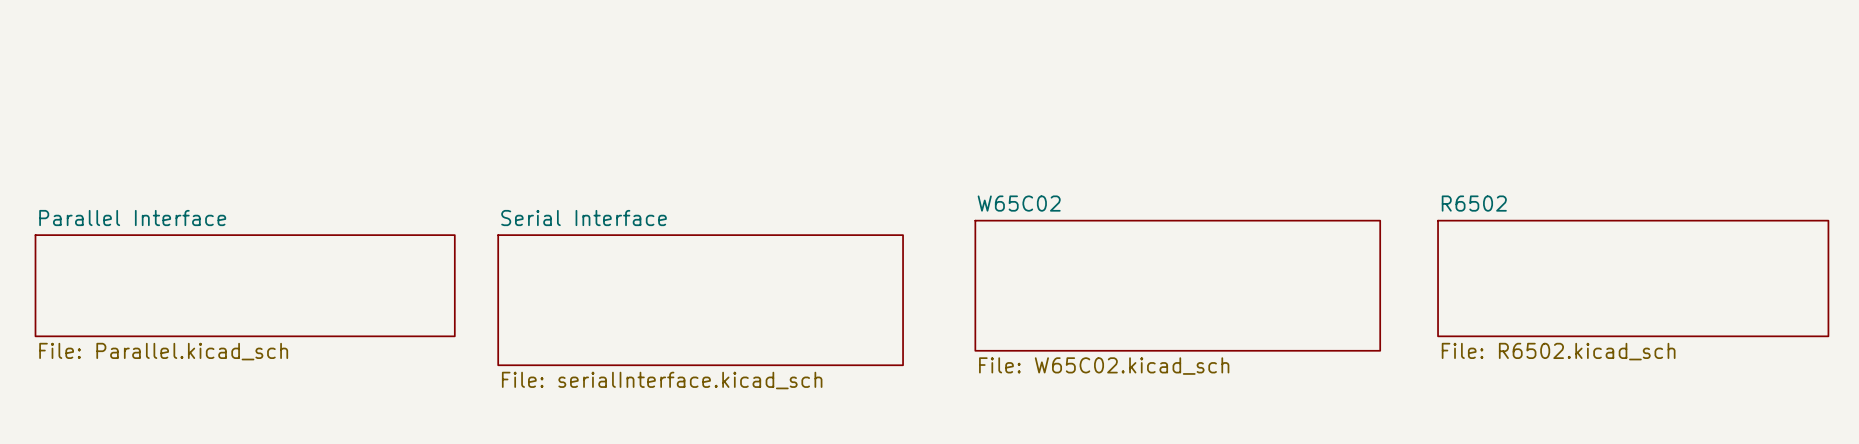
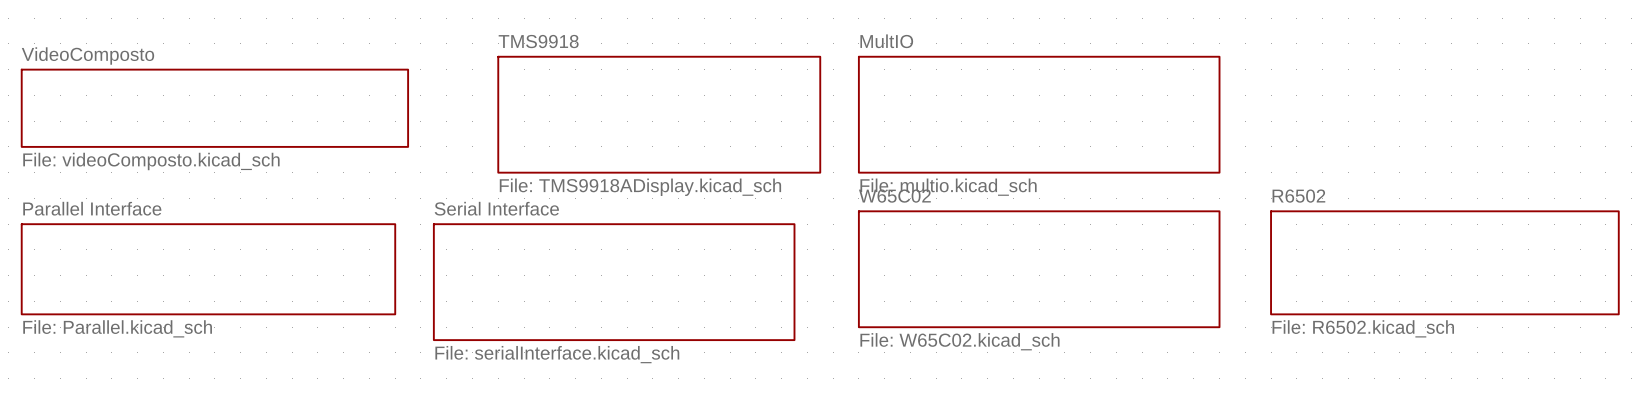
sheet VideoComposto: none -> File: videoComposto.kicad_sch (214, 108)
sheet TMS9918: none -> File: TMS9918ADisplay.kicad_sch (659, 114)
sheet MultIO: none -> File: multio.kicad_sch (1039, 114)

